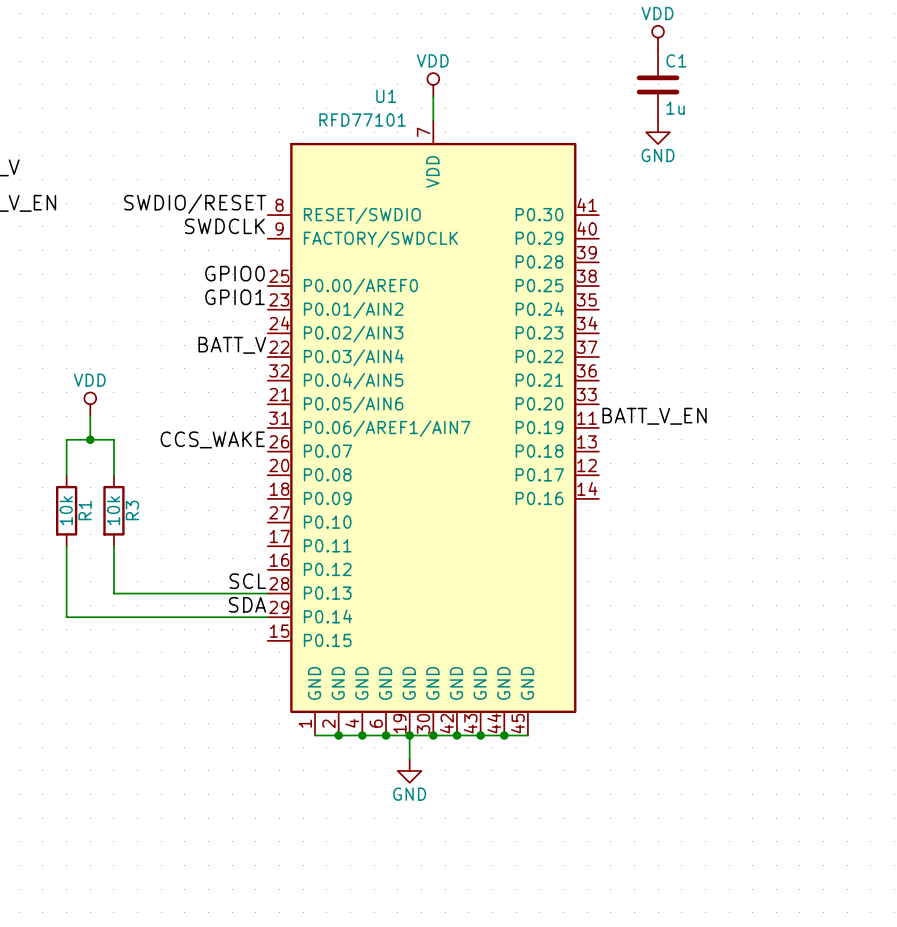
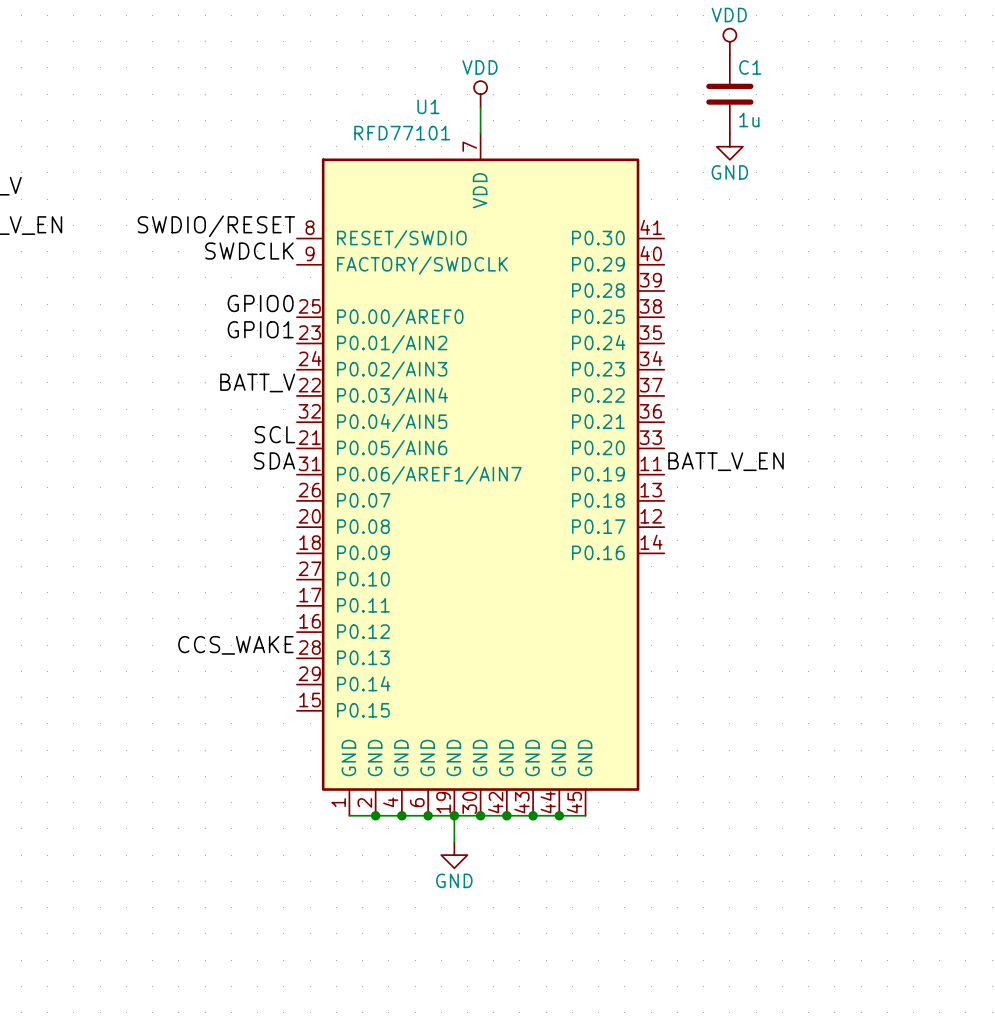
label: none -> SCL (274, 434)
power symbol: VDD (90, 404) -> none
wire: (90, 416) (90, 439) -> none
junction: (90, 439) -> none
label: CCS_WAKE (212, 439) -> none
wire: (66, 475) (66, 439) (113, 439) (113, 475) -> none
R1: 10k (66, 510) -> none
R3: 10k (113, 510) -> none
wire: (66, 546) (66, 617) (267, 617) -> none
wire: (113, 546) (113, 593) (267, 593) -> none
label: SCL (247, 581) -> CCS_WAKE (235, 645)
label position: SDA (247, 604) -> SDA (274, 460)

